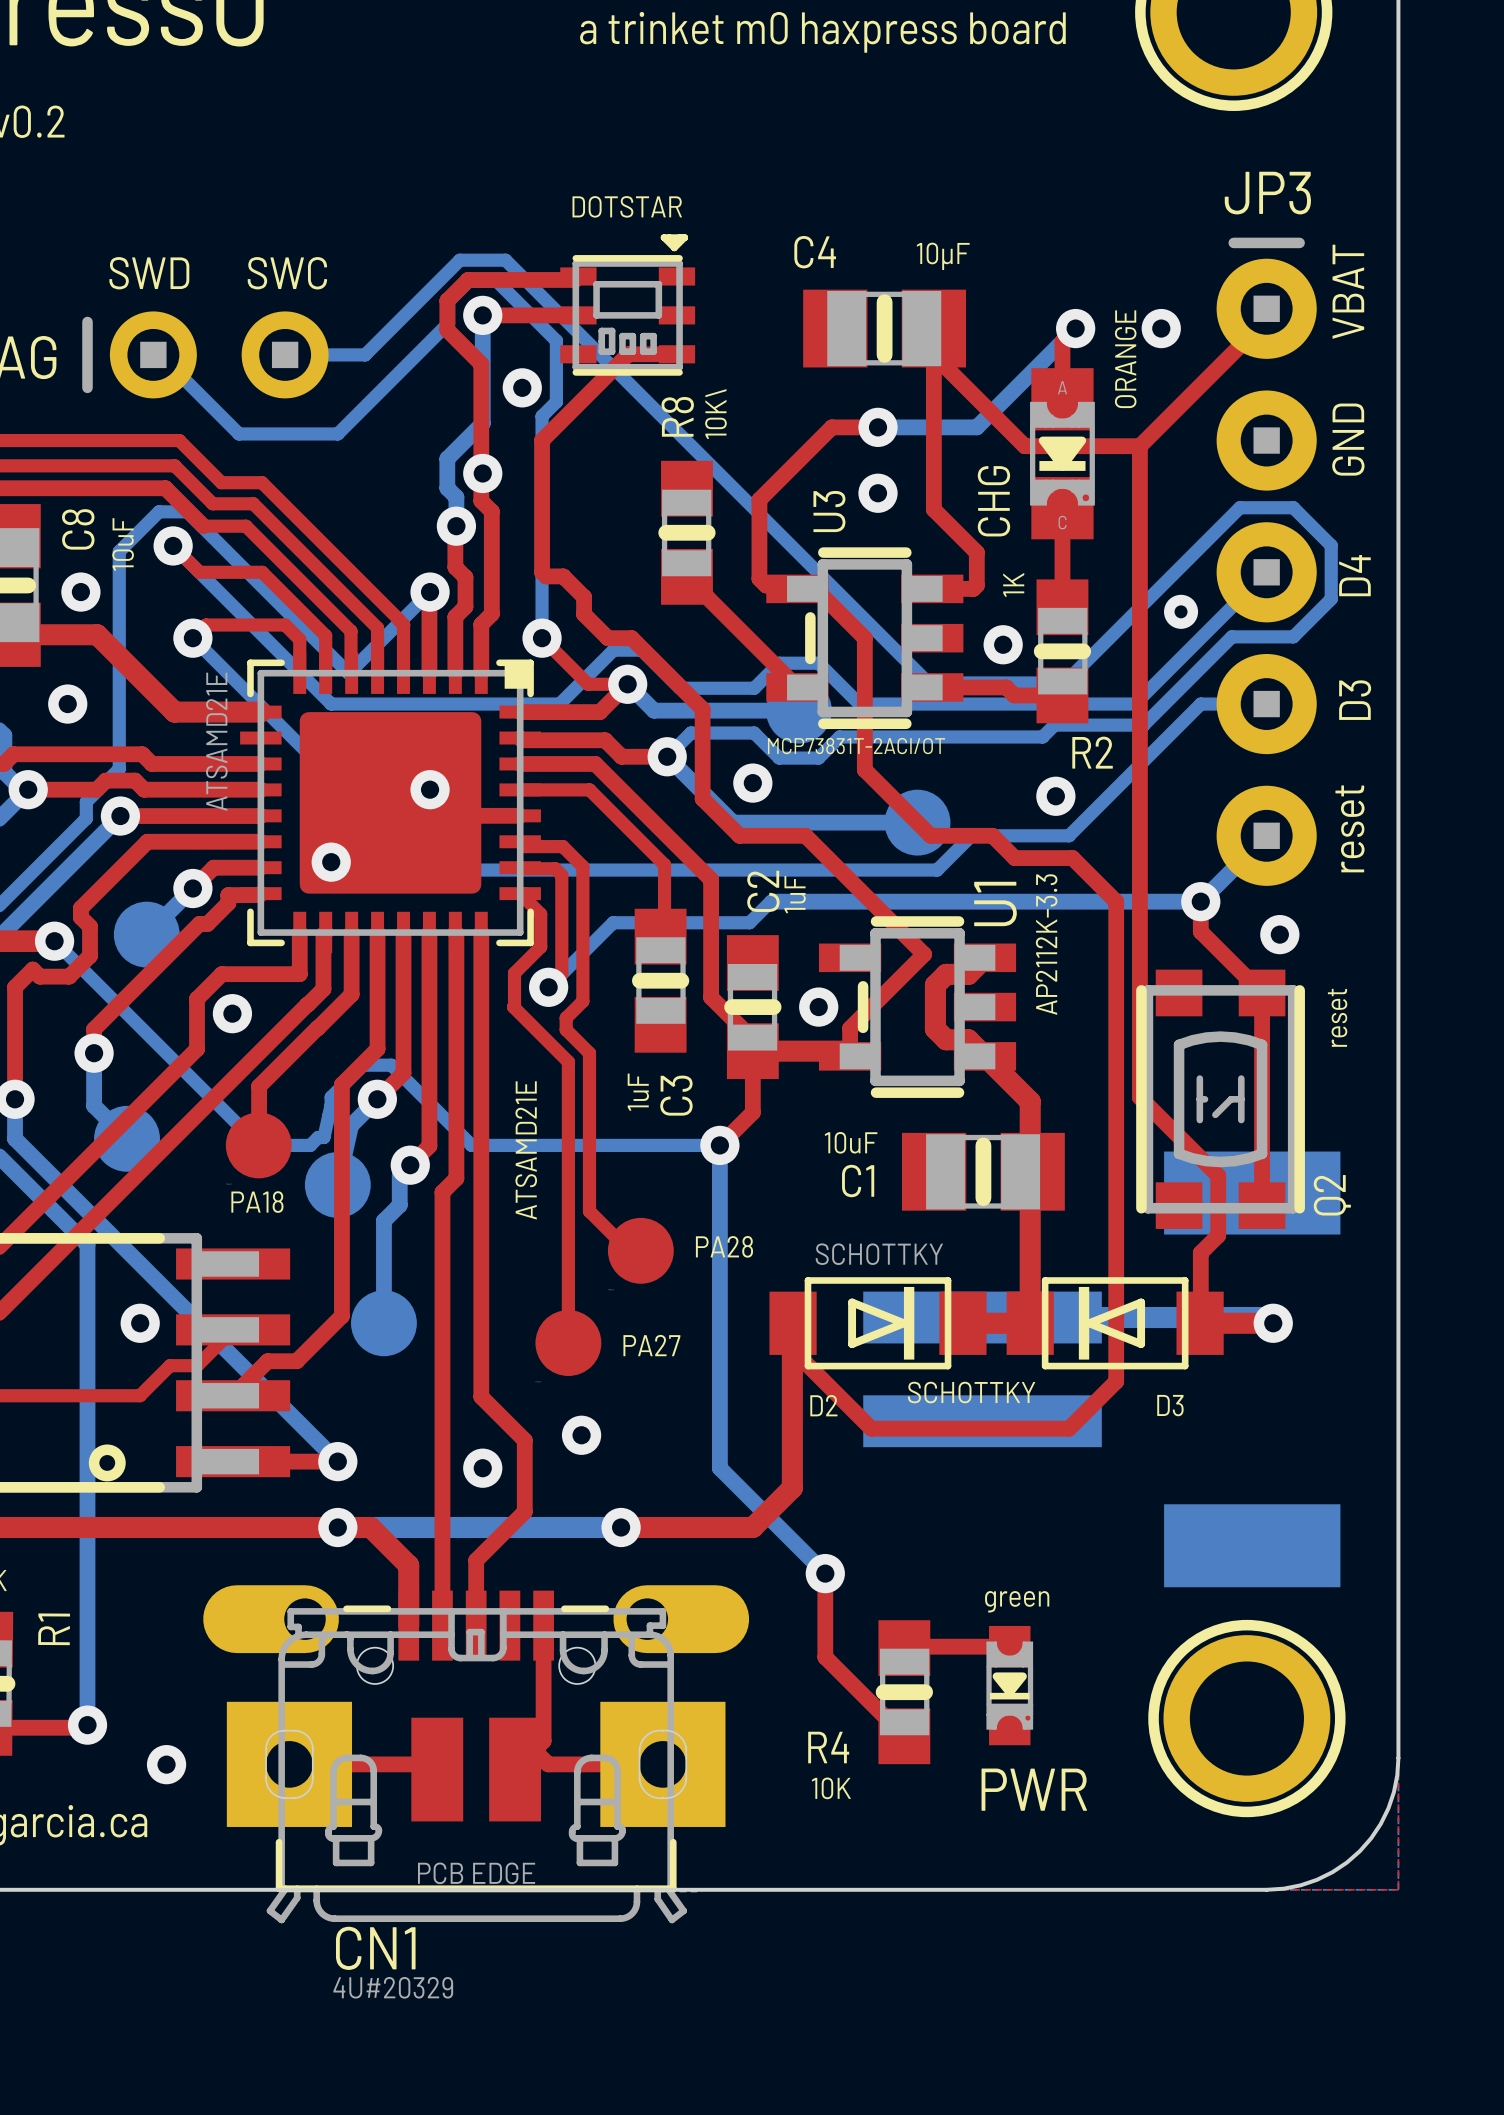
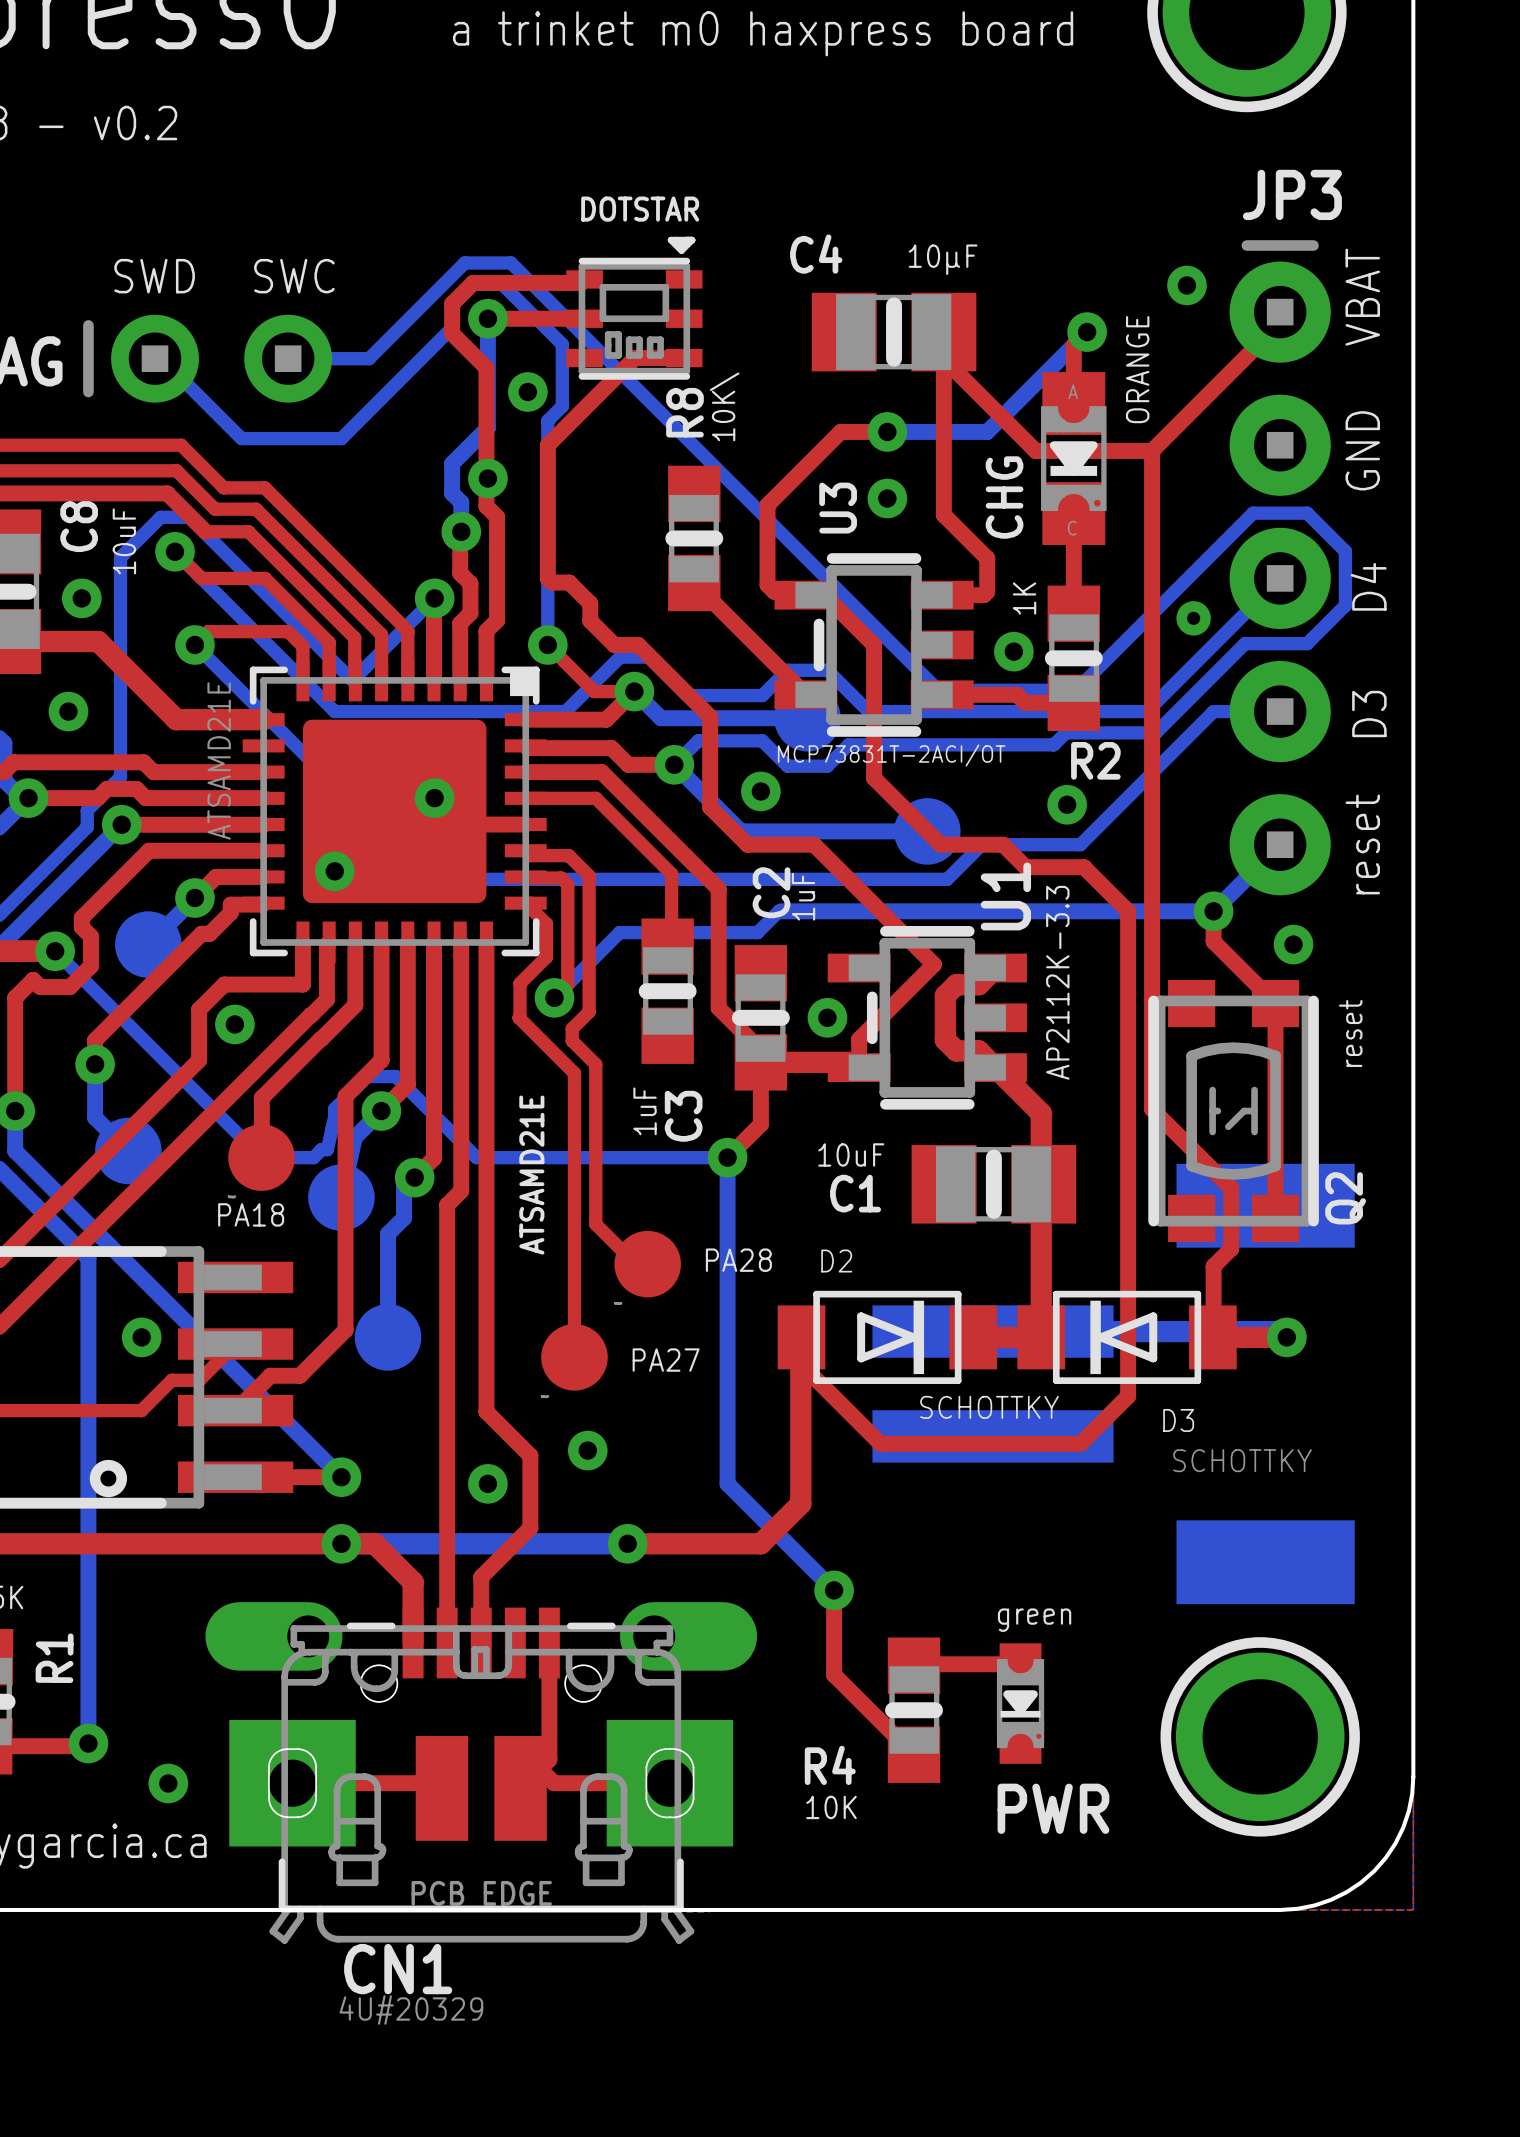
via position: (1161, 328) -> (1186, 285)
D3 value position: SCHOTTKY (879, 1254) -> SCHOTTKY (1242, 1460)
D2 name position: D2 (823, 1405) -> D2 (836, 1261)

